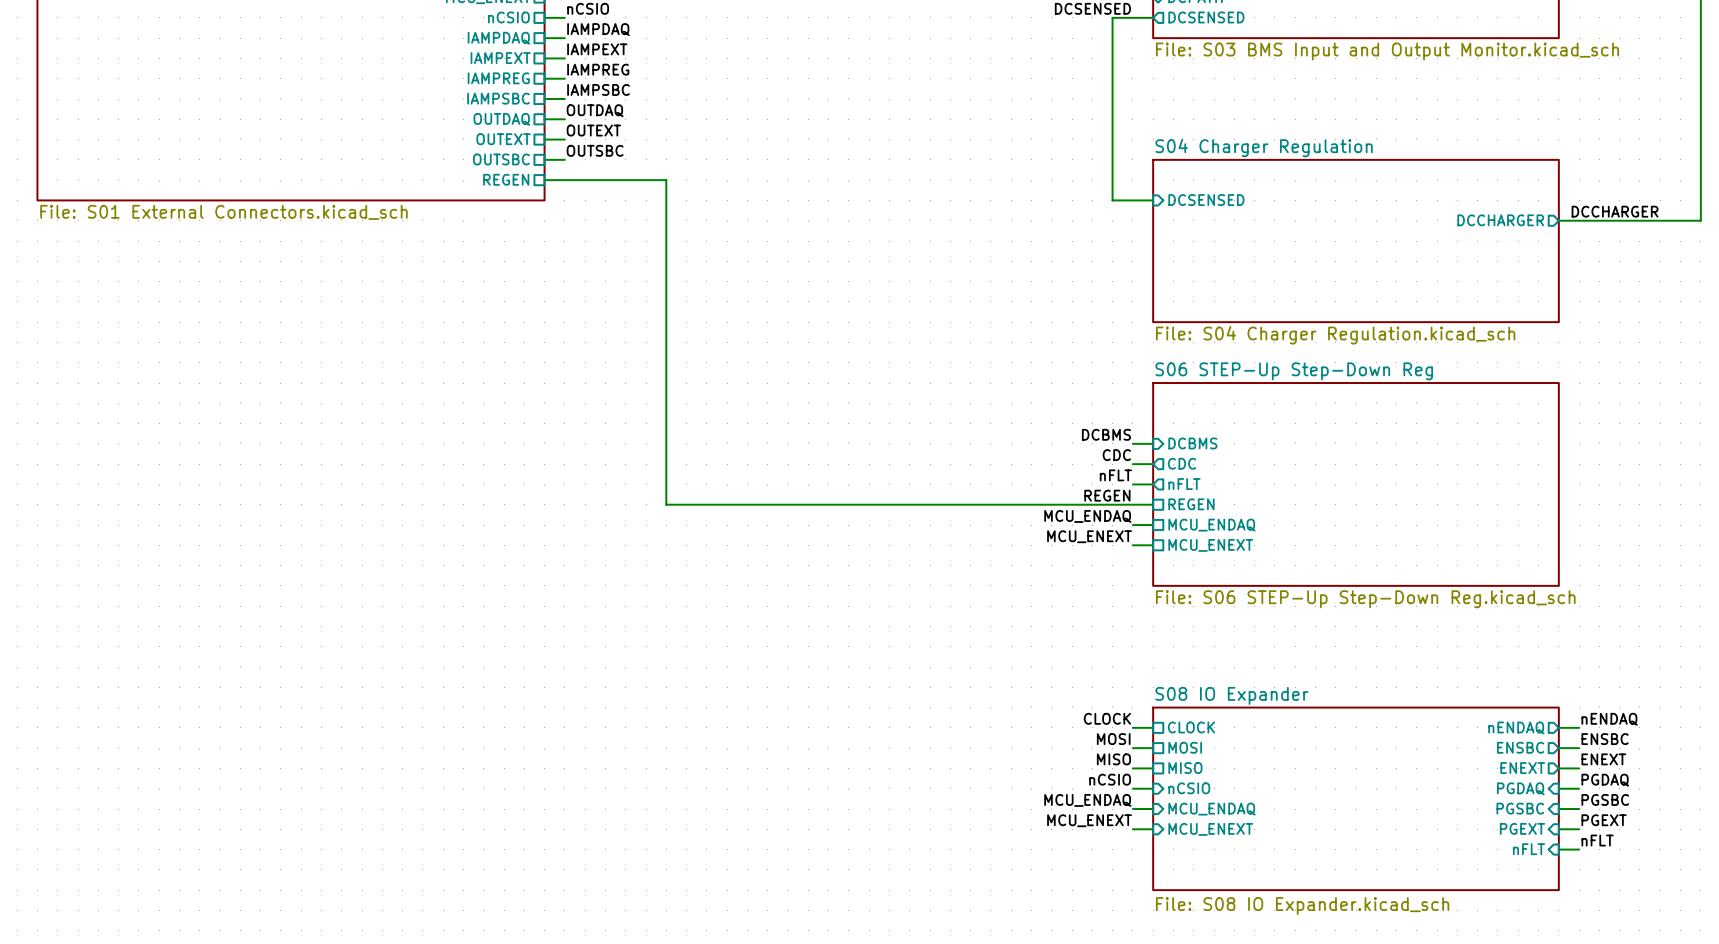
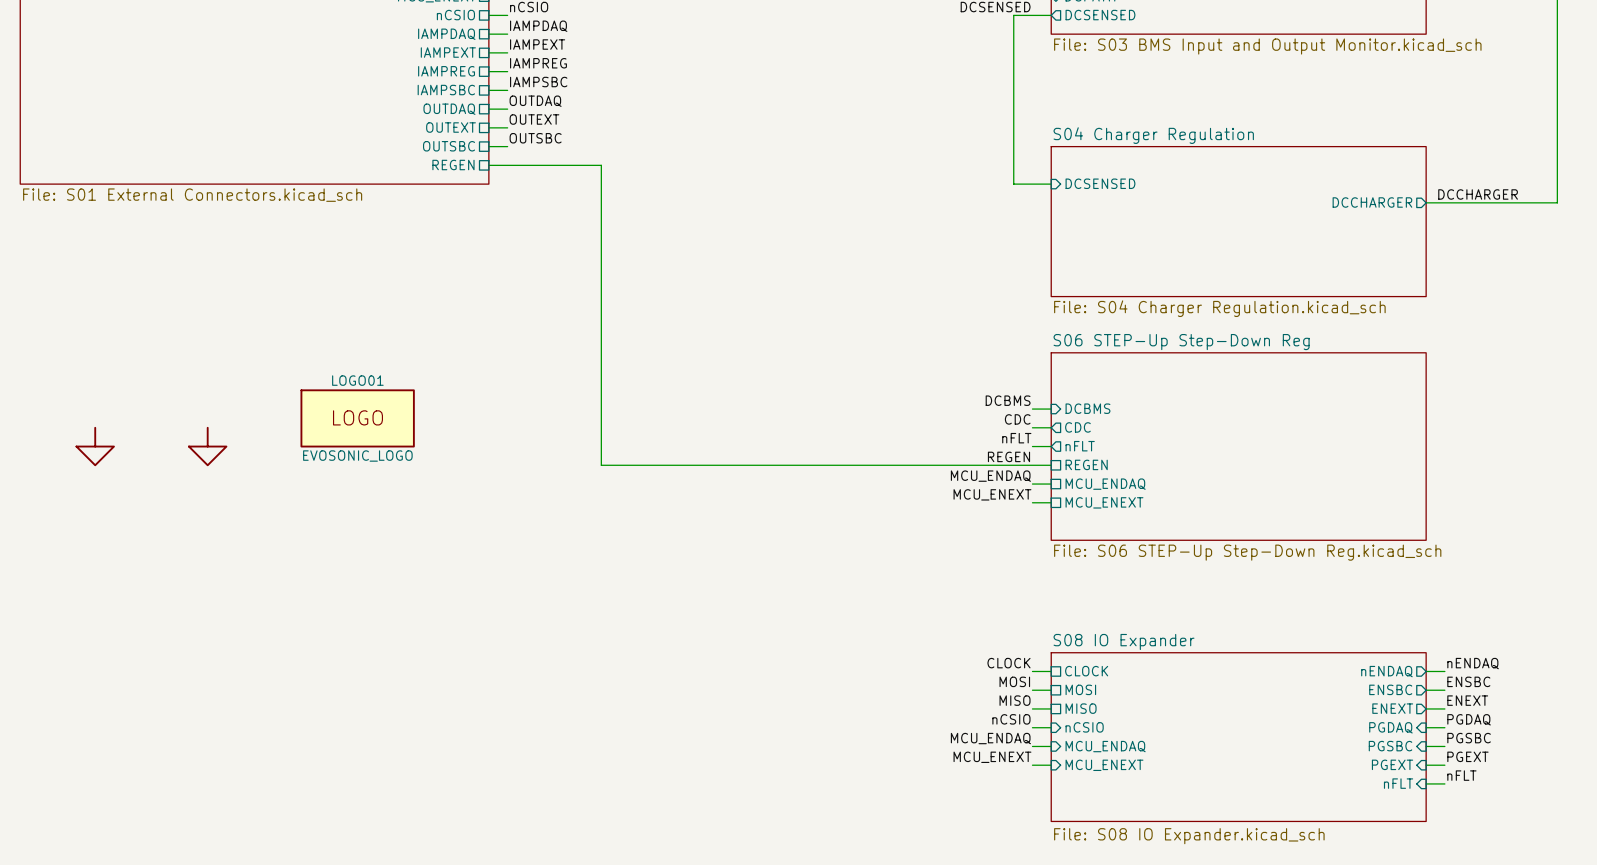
LOGO01: none -> EVOSONIC_LOGO (357, 418)
power symbol: none -> (95, 446)
power symbol: none -> (207, 446)

